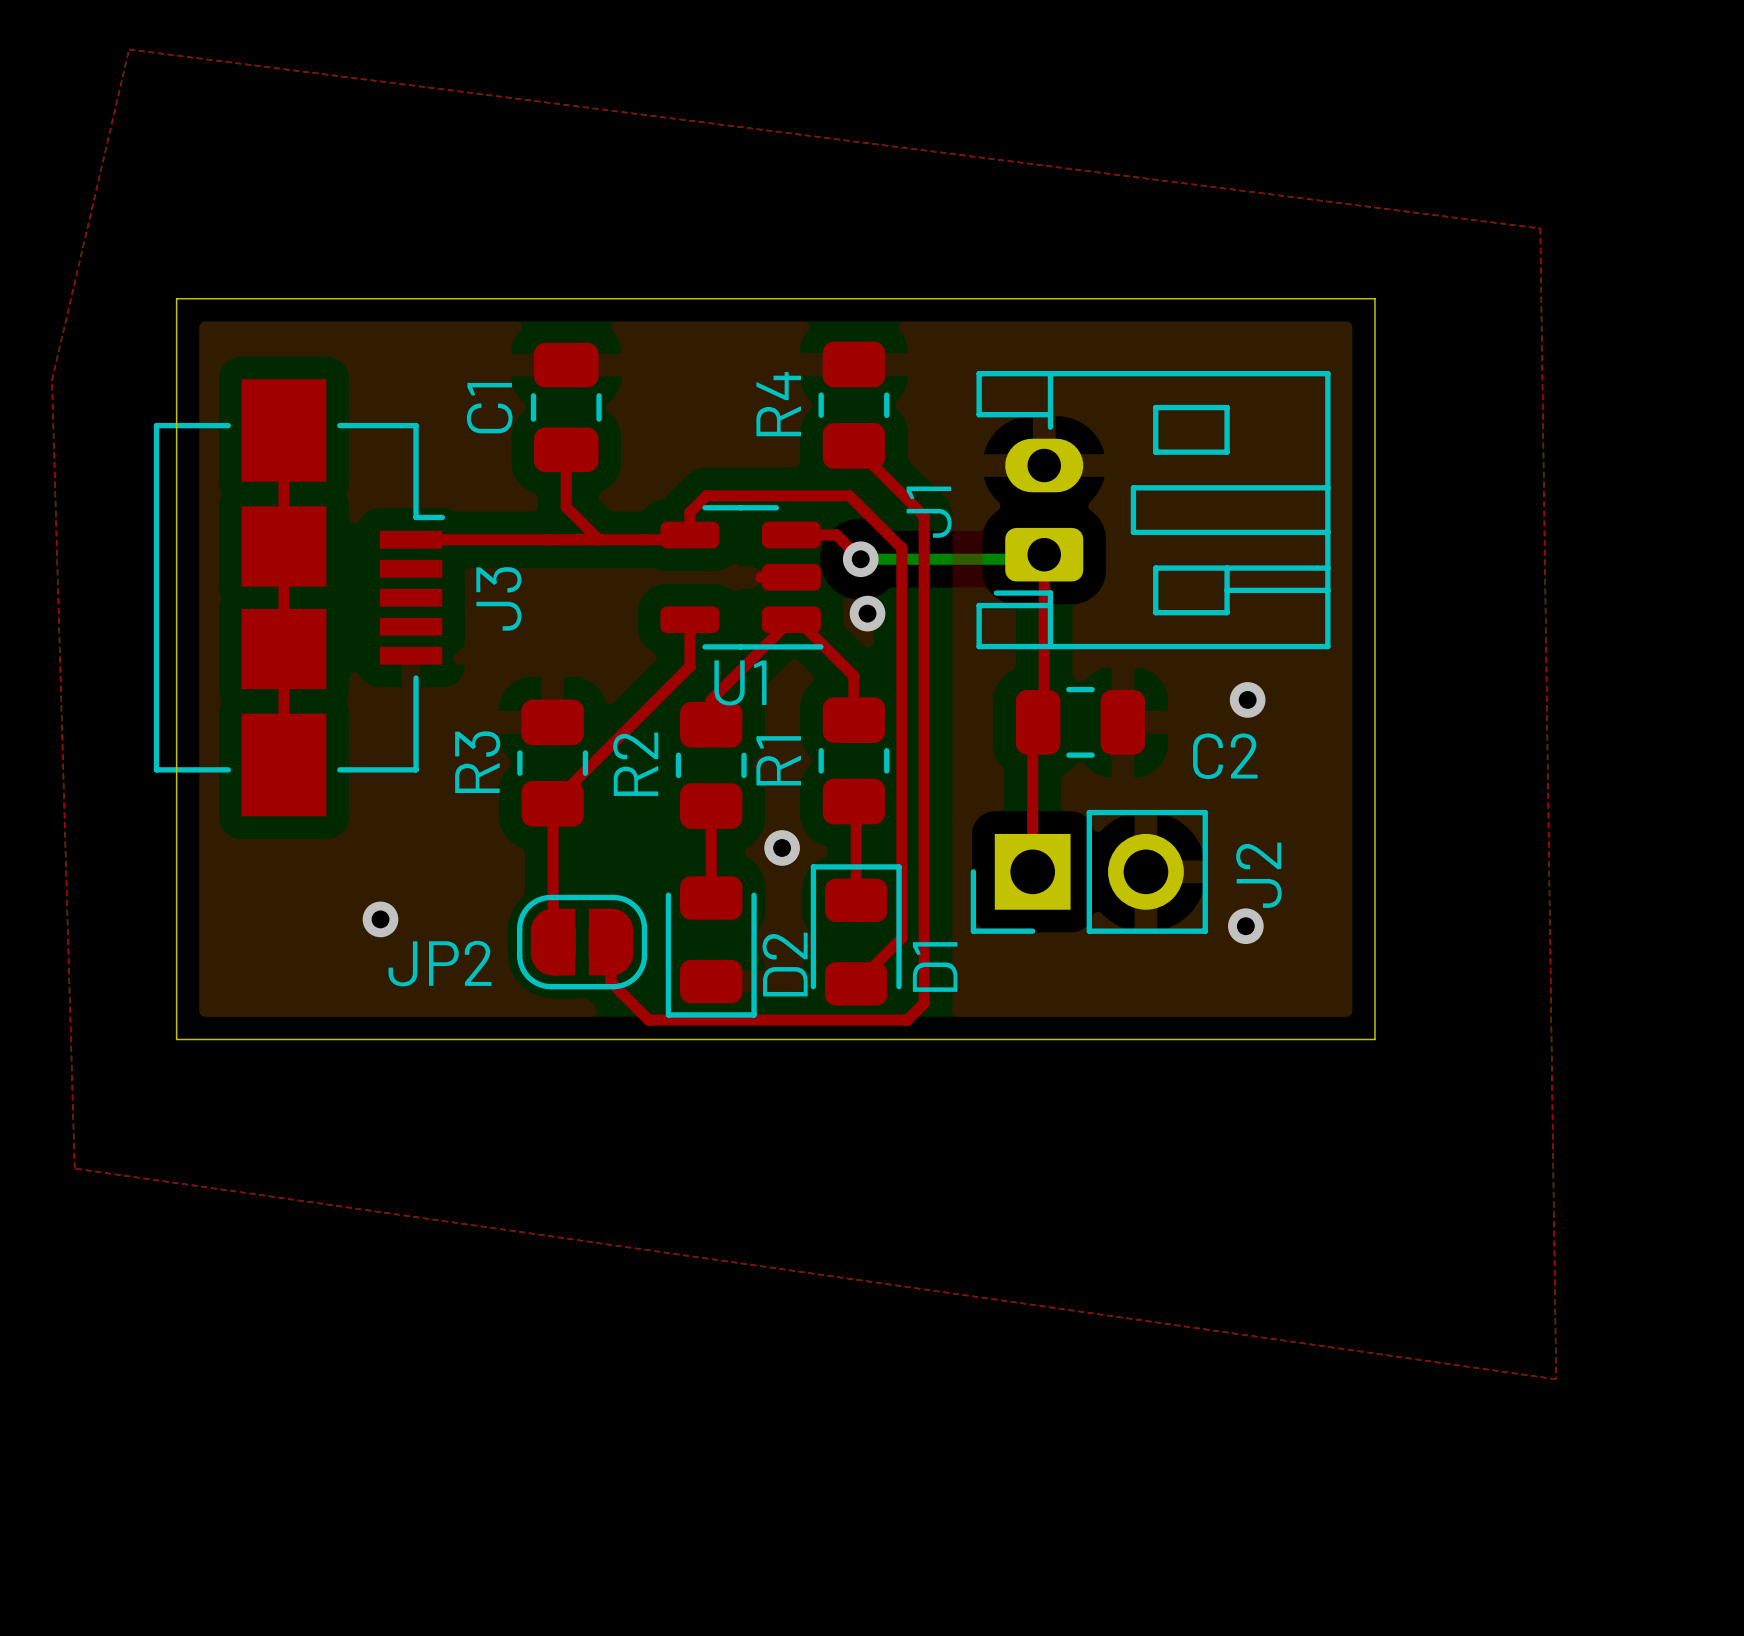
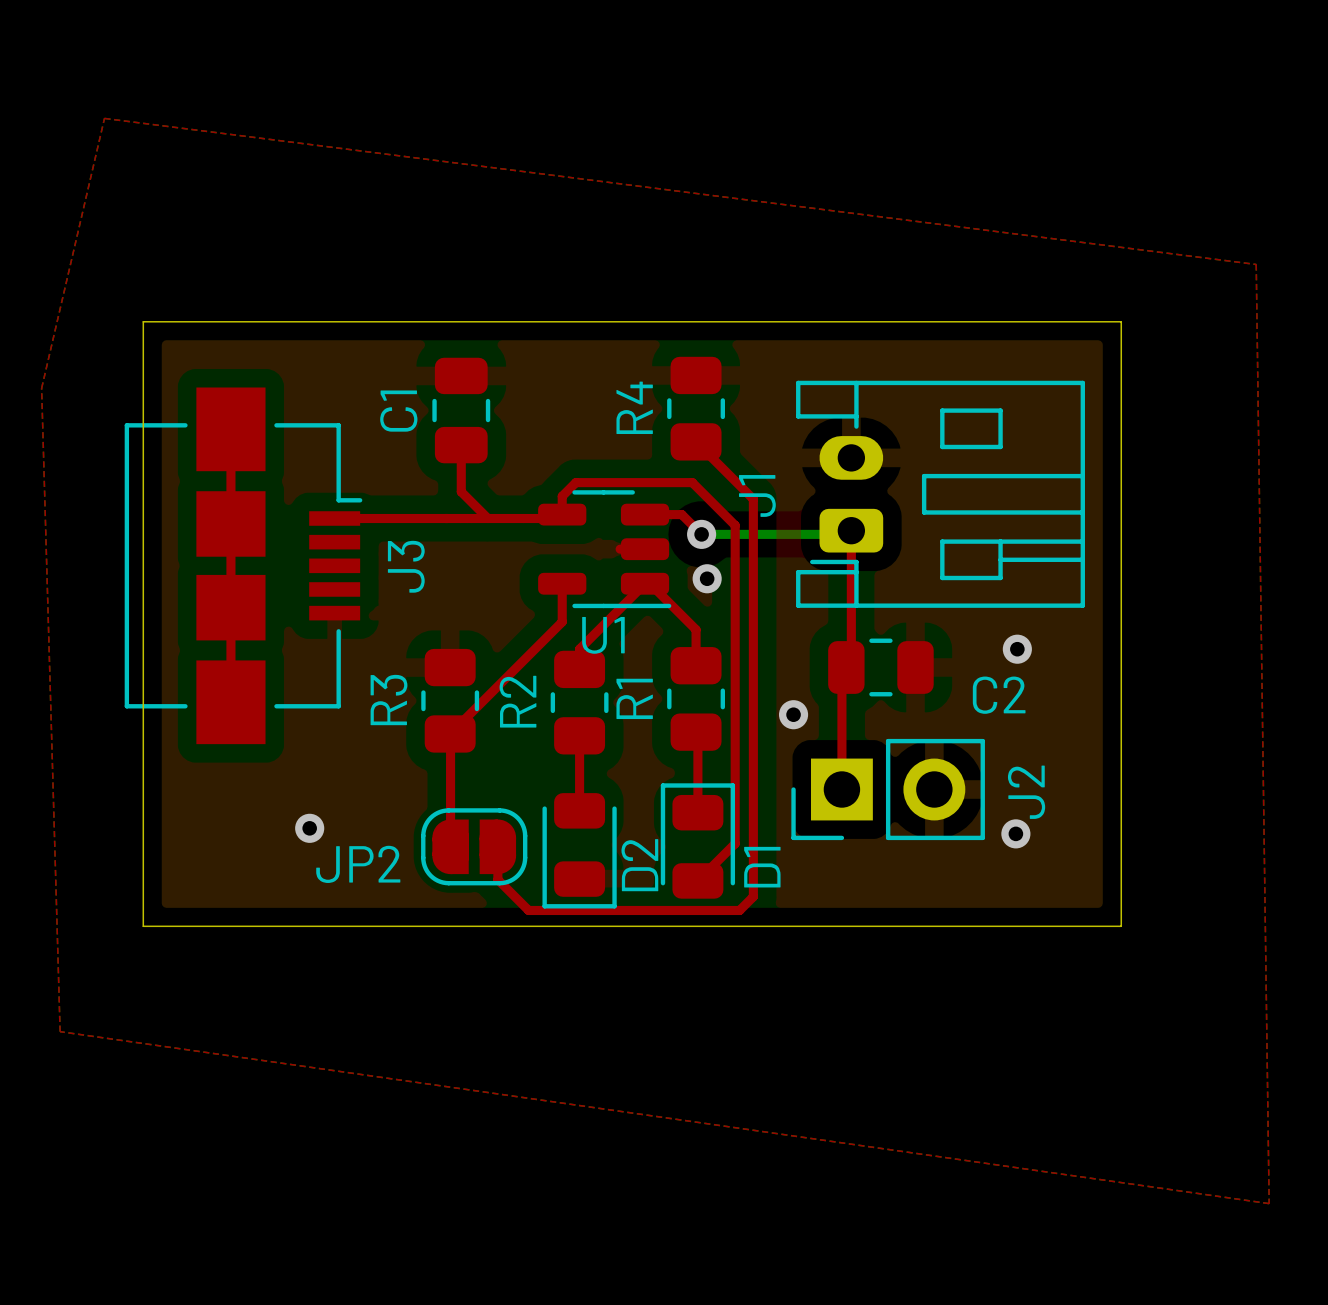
via position: (782, 847) -> (793, 714)

